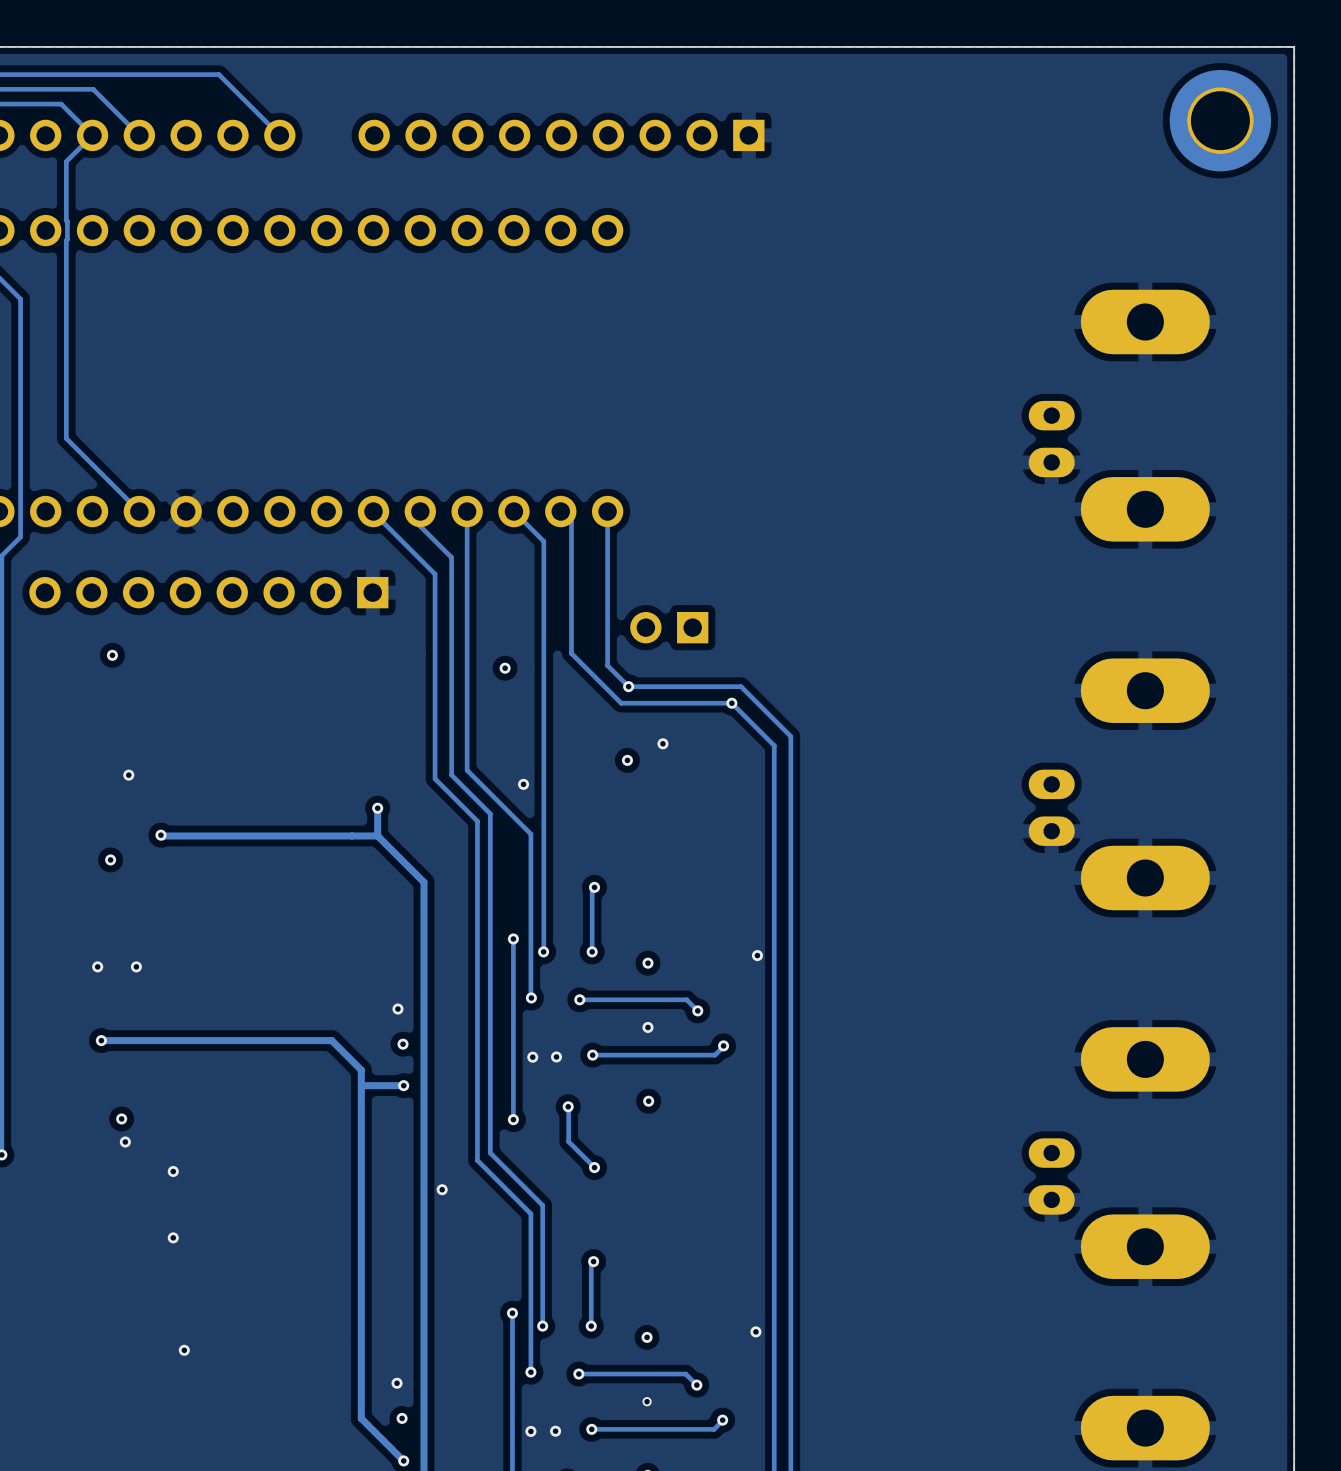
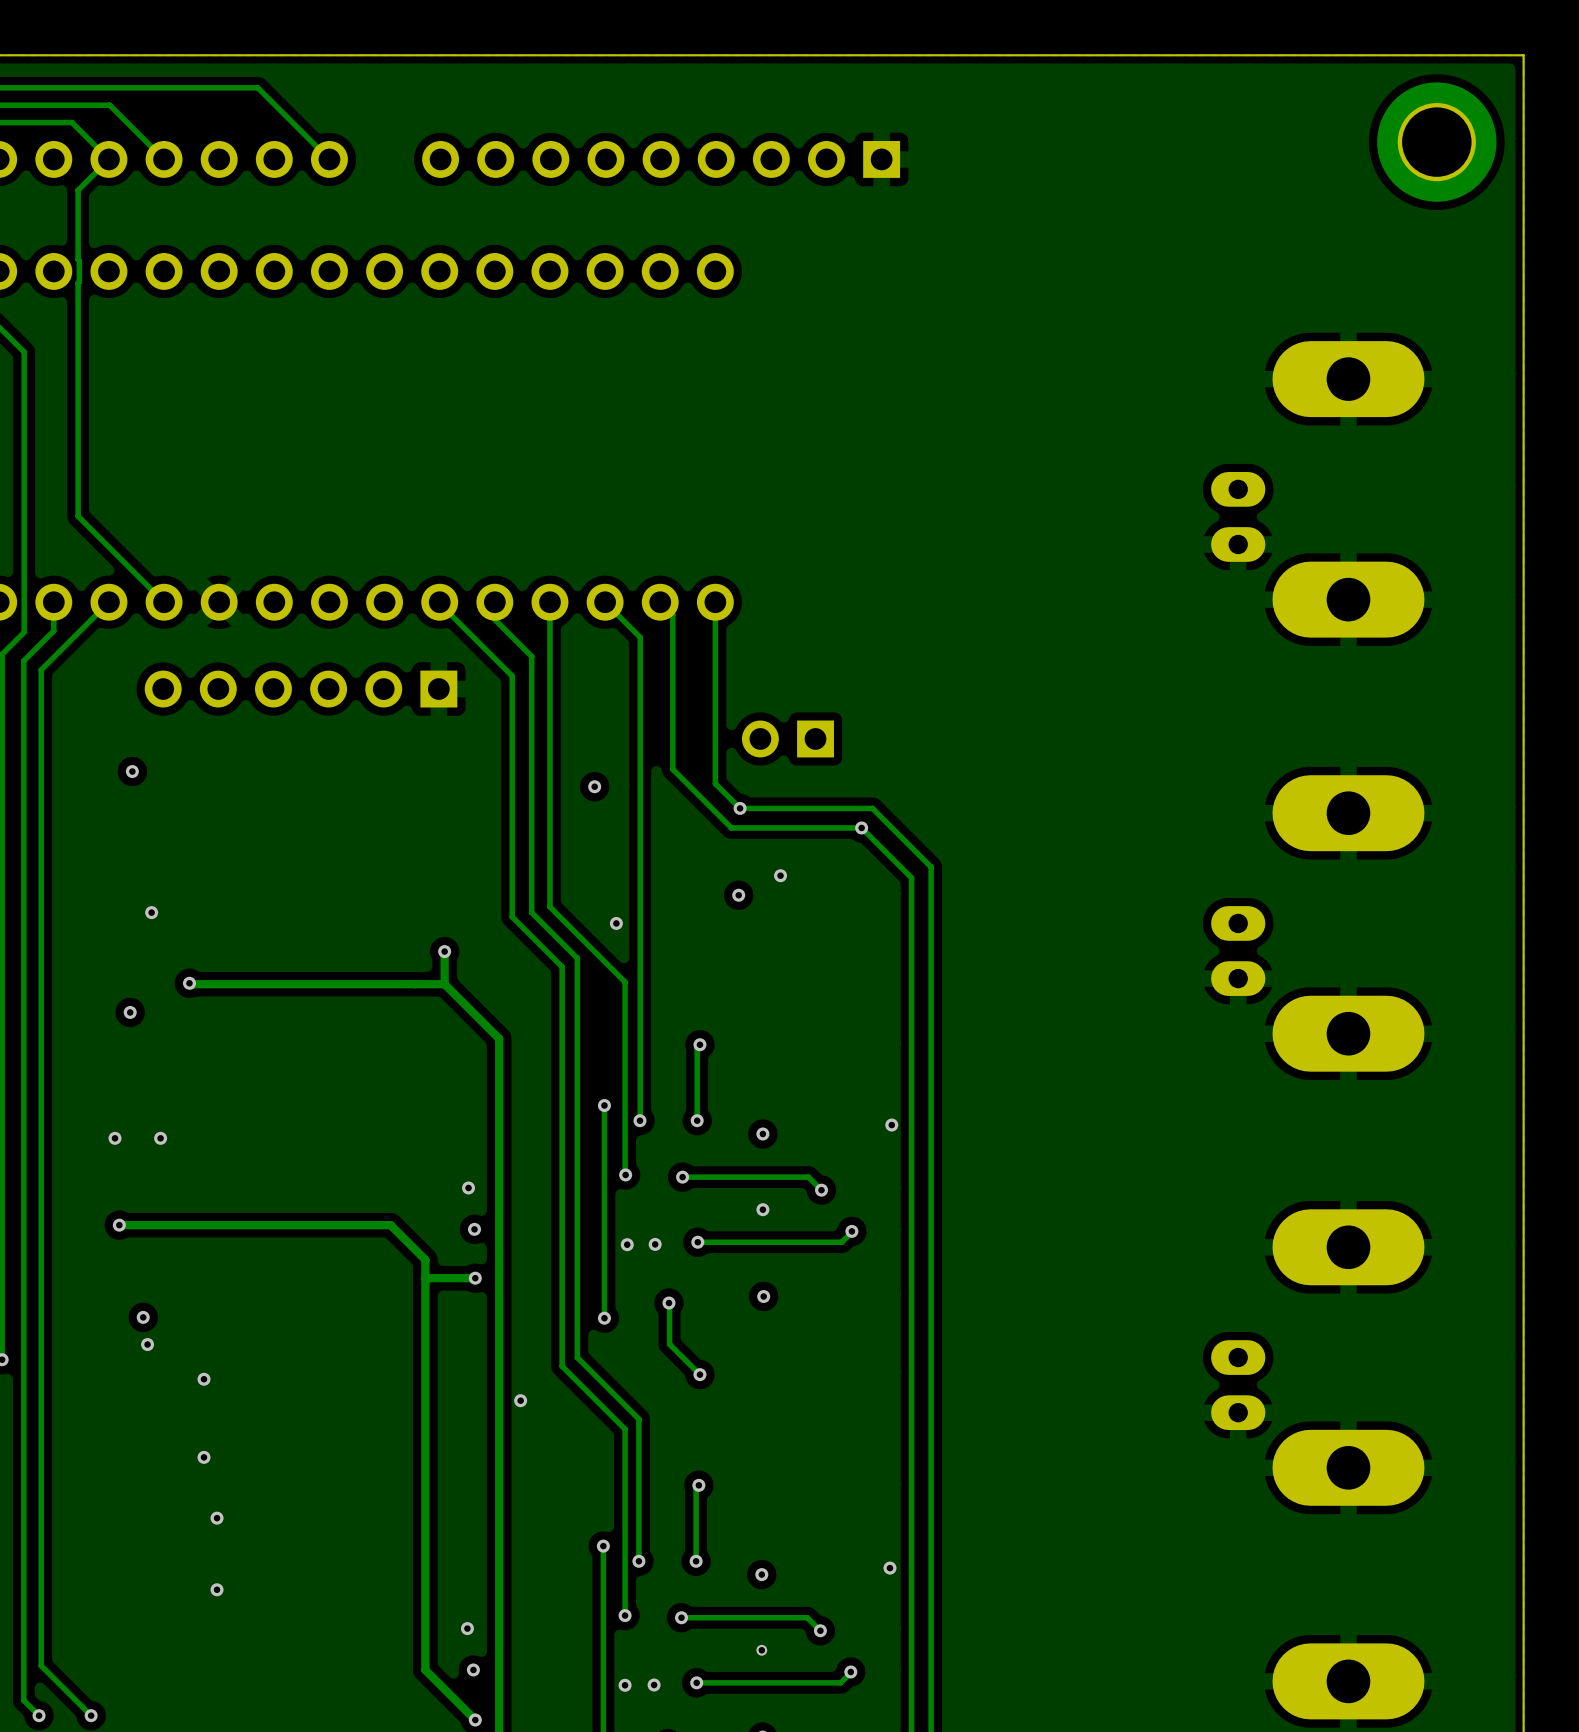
track: none -> (53, 602) (53, 630) (23, 660) (23, 1700) (39, 1715)
track: none -> (108, 602) (41, 669) (41, 1665) (91, 1715)
part: none -> (301, 689)
part: (208, 592) -> none
via: none -> (217, 1518)
via: none -> (39, 1715)
via: none -> (91, 1715)

